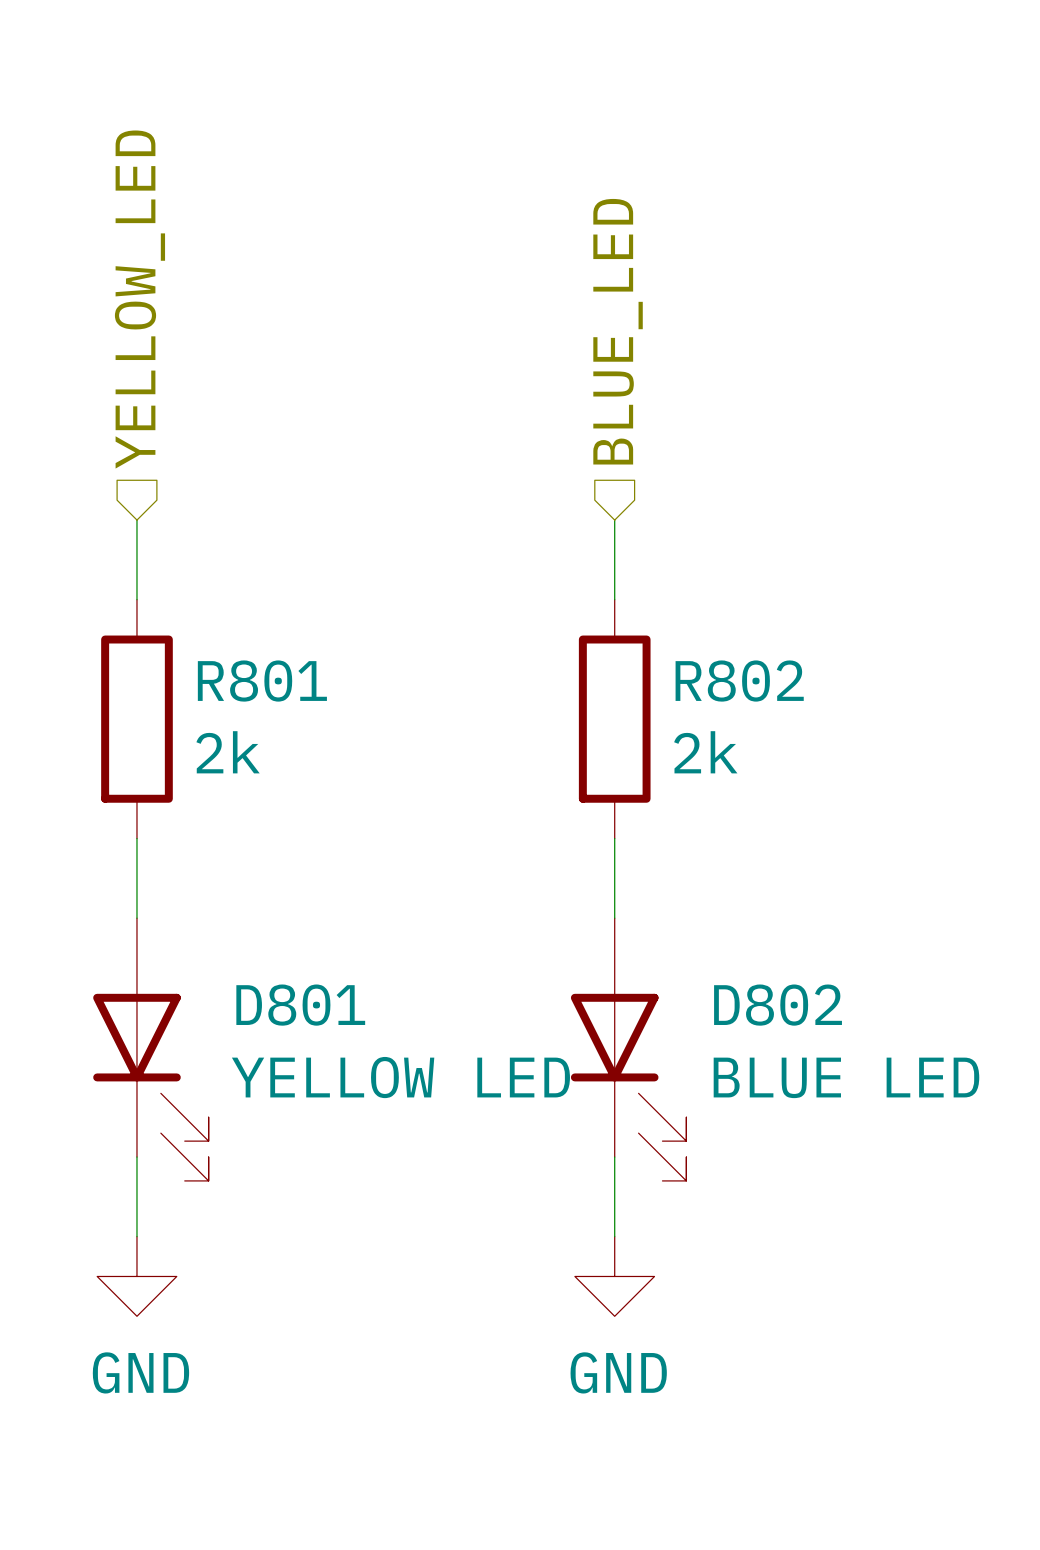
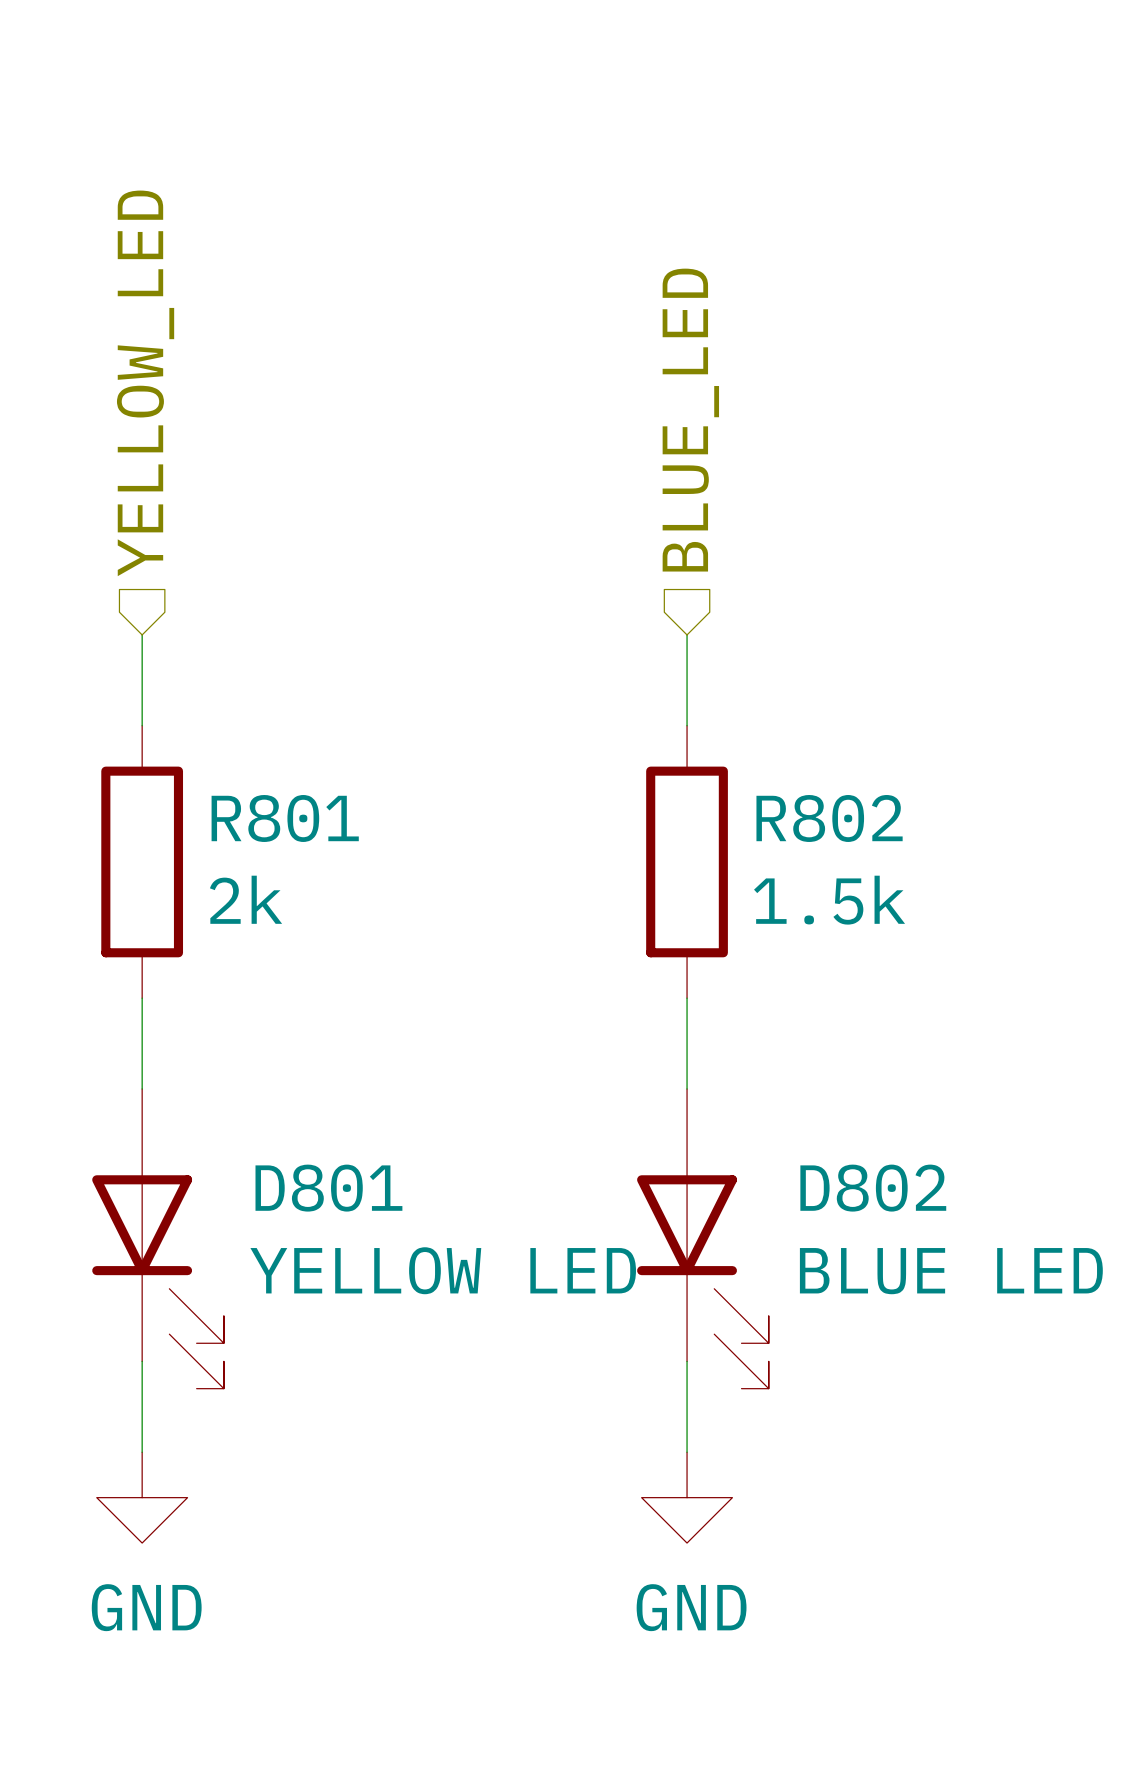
R802 value: 2k (705, 752) -> 1.5k (829, 900)

